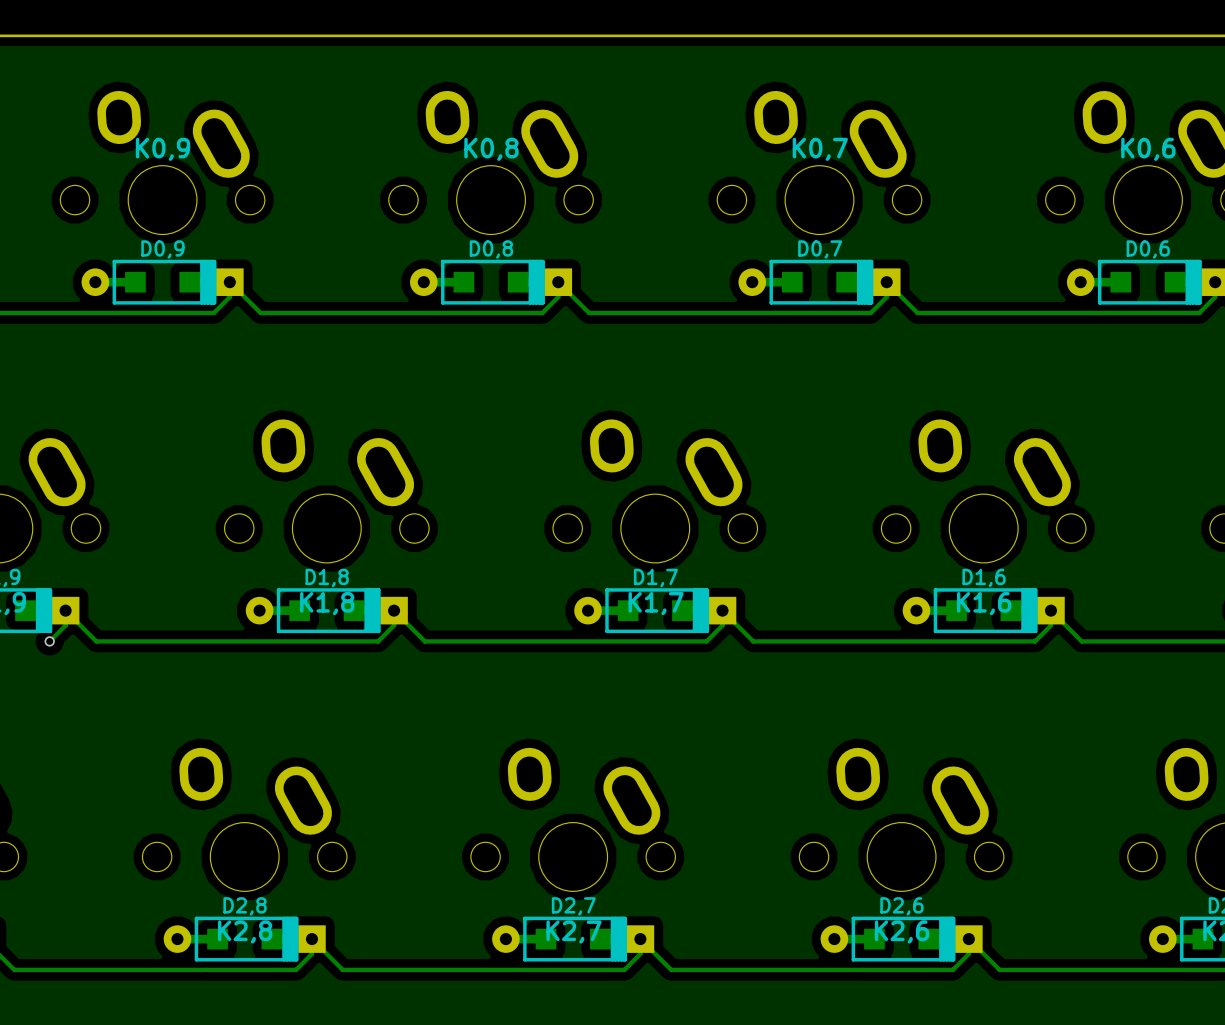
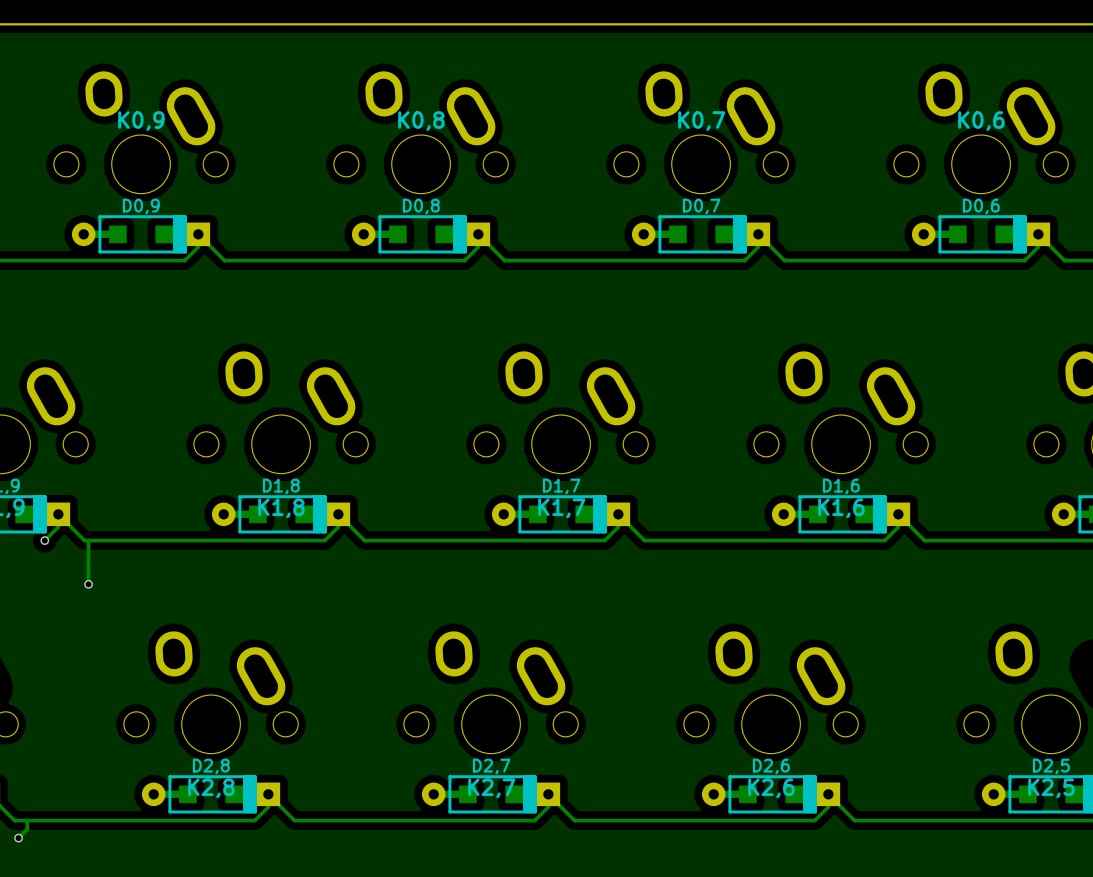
track: none -> (88, 540) (88, 584)
via: none -> (88, 584)
track: none -> (27, 820) (27, 829) (18, 838)
via: none -> (18, 838)

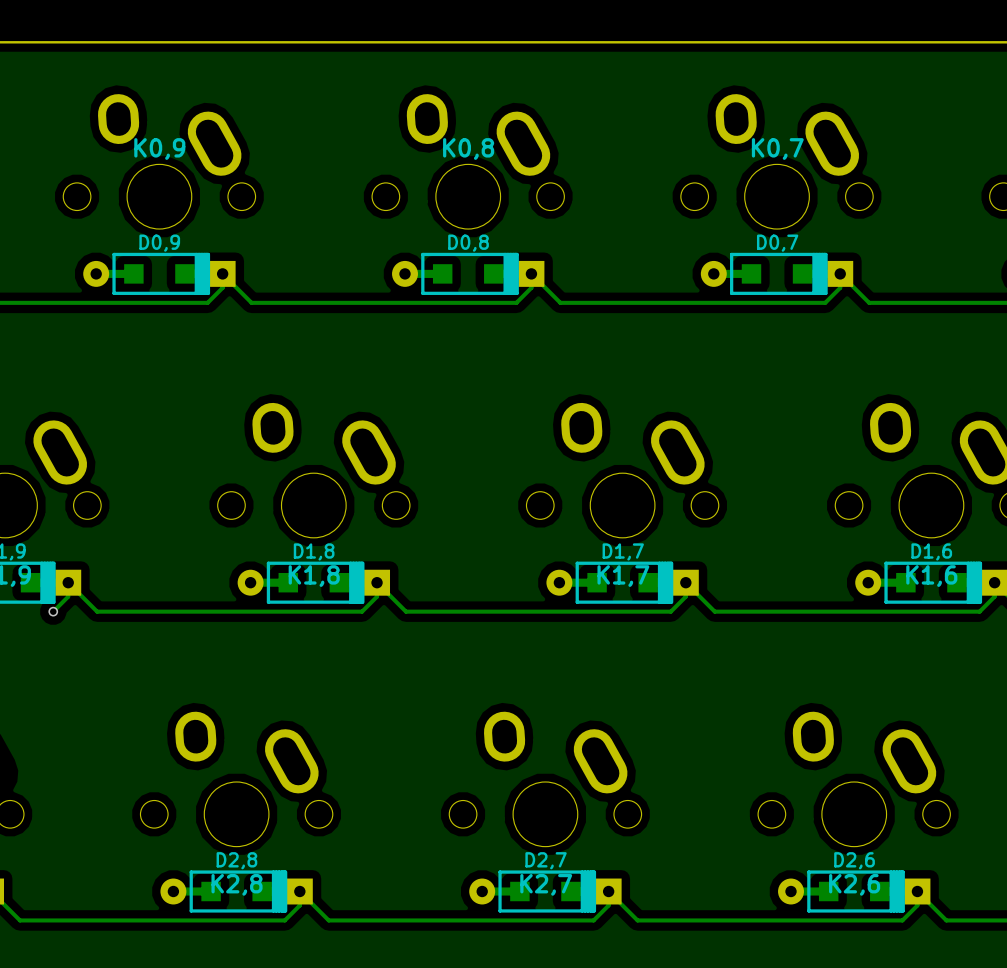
track: (88, 540) (88, 584) -> none
via: (88, 584) -> none
track: (27, 820) (27, 829) (18, 838) -> none
via: (18, 838) -> none

